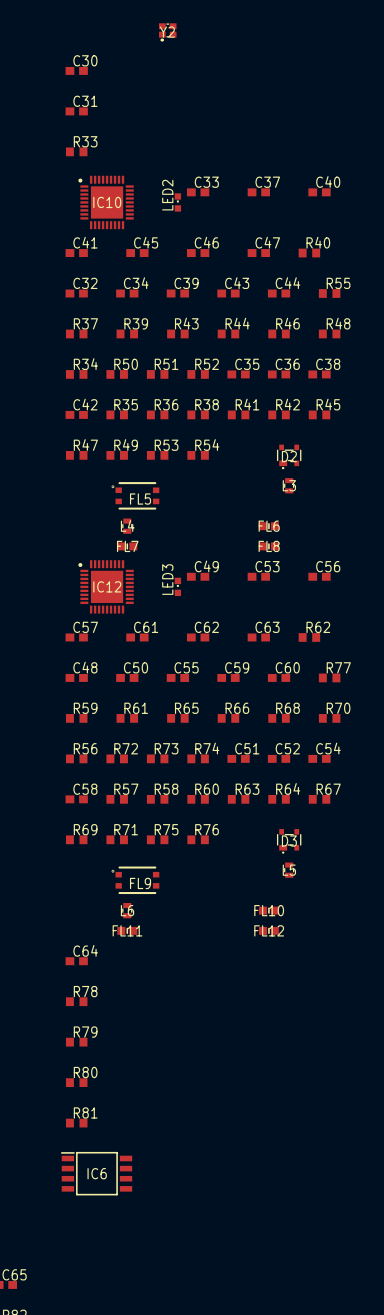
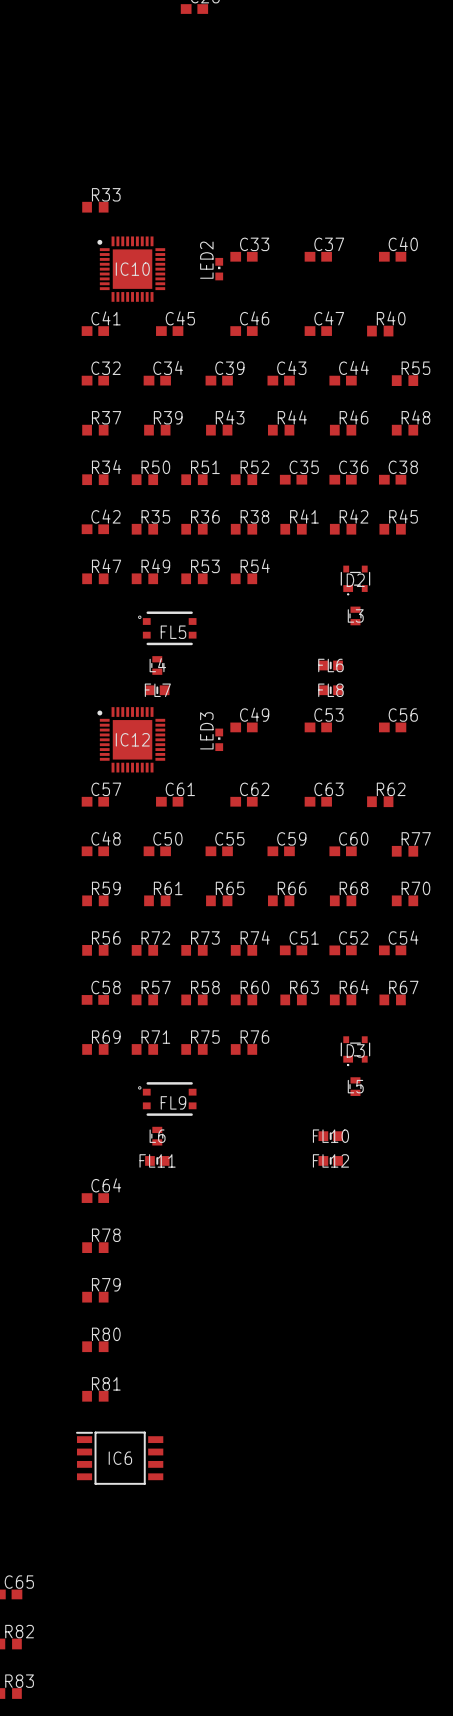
Y2: (167, 32) -> none
C30: (76, 70) -> none
C31: (76, 111) -> none

